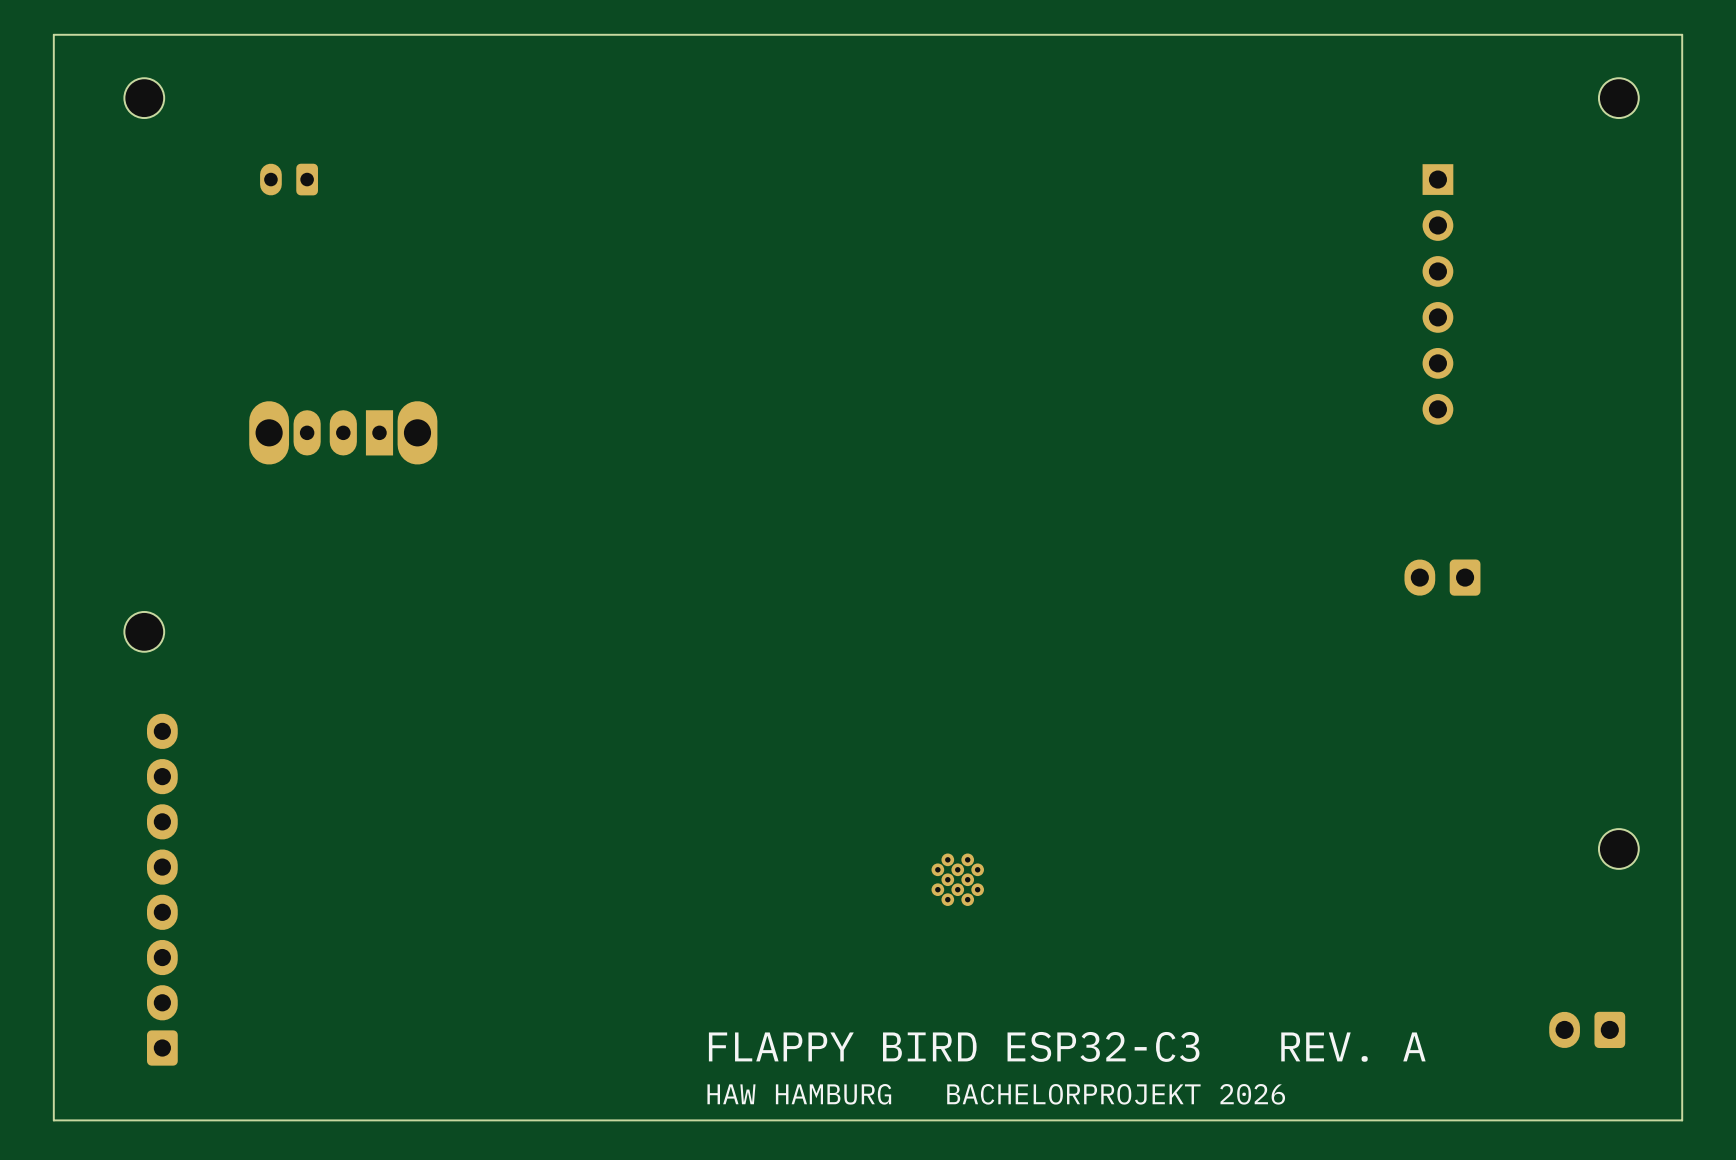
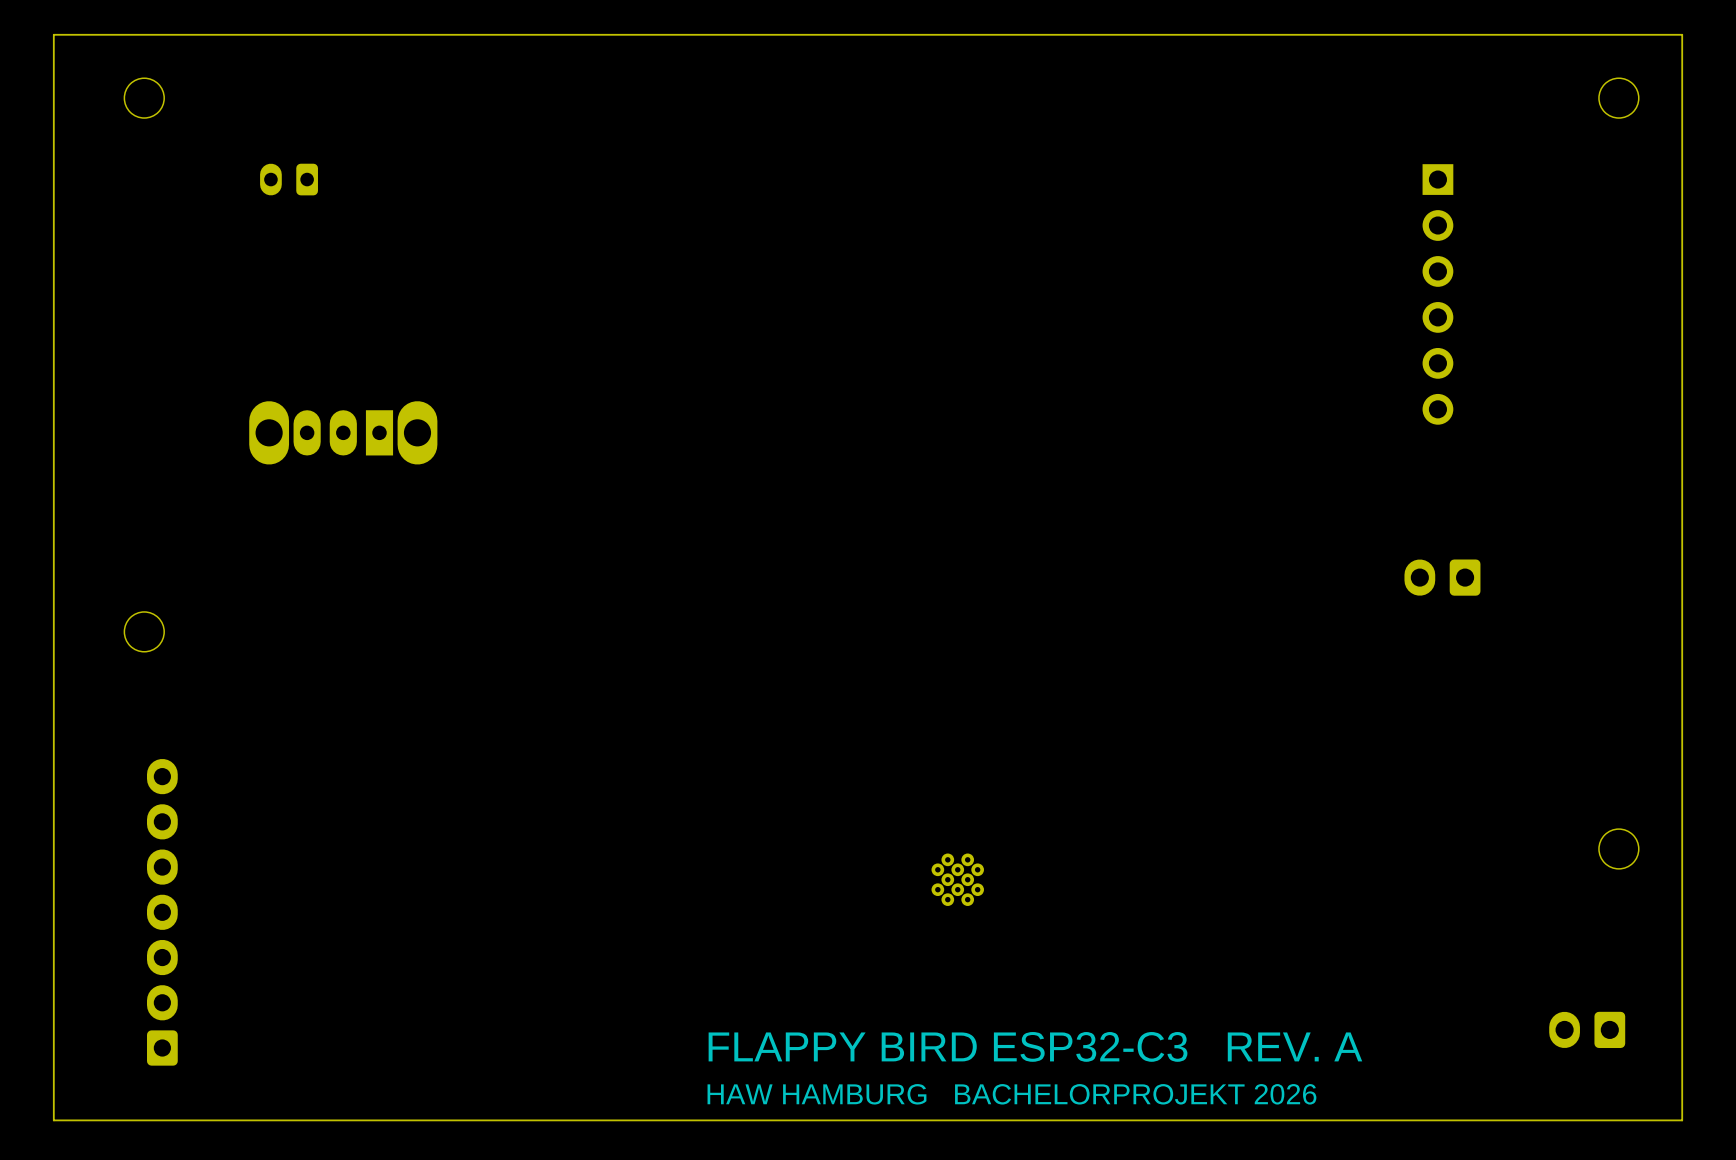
part: (162, 889) -> none

